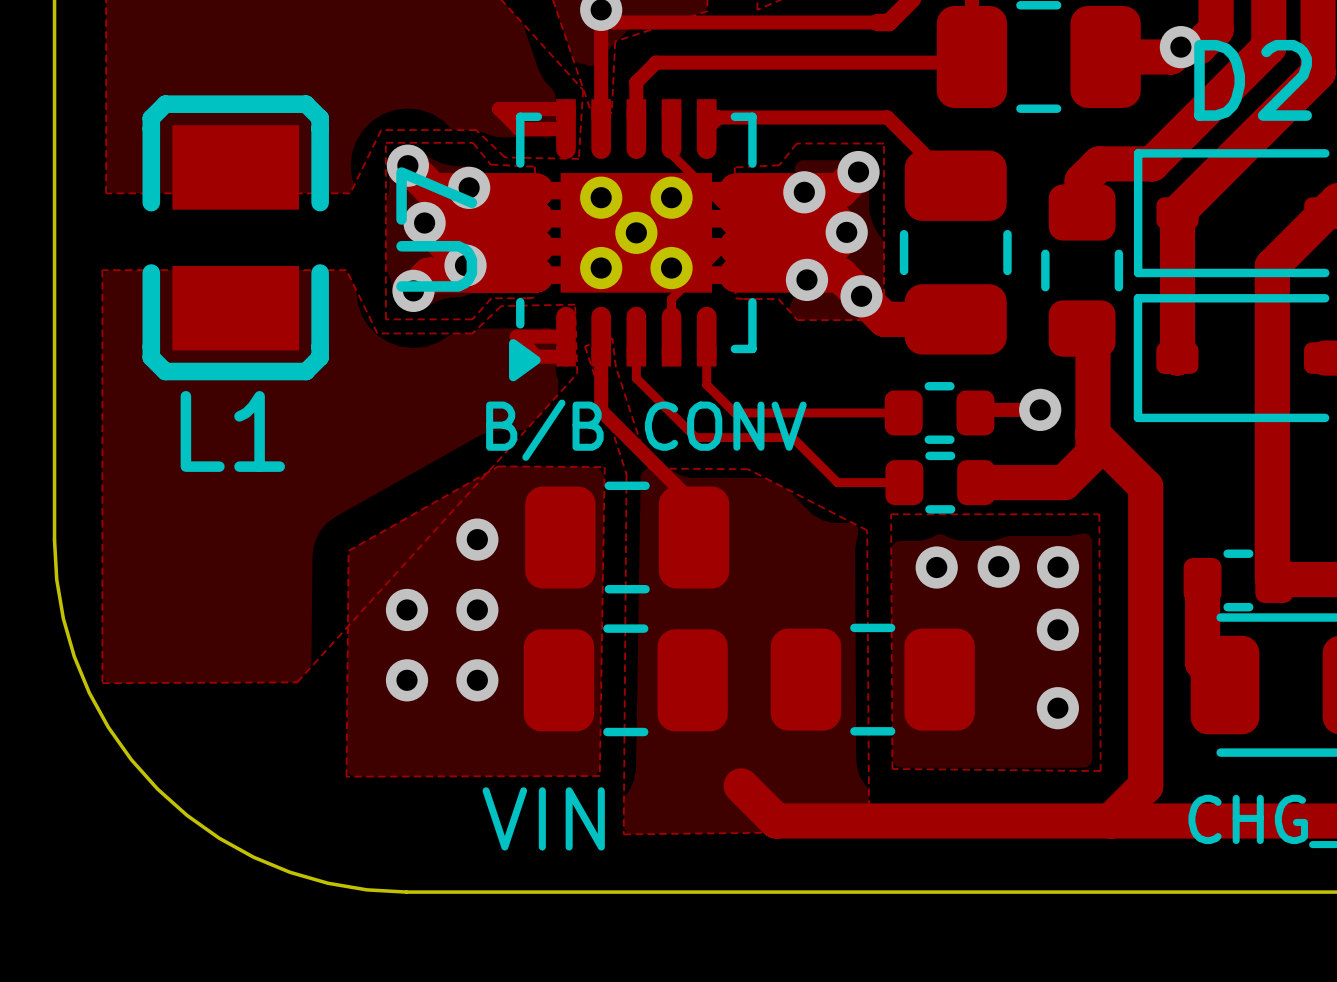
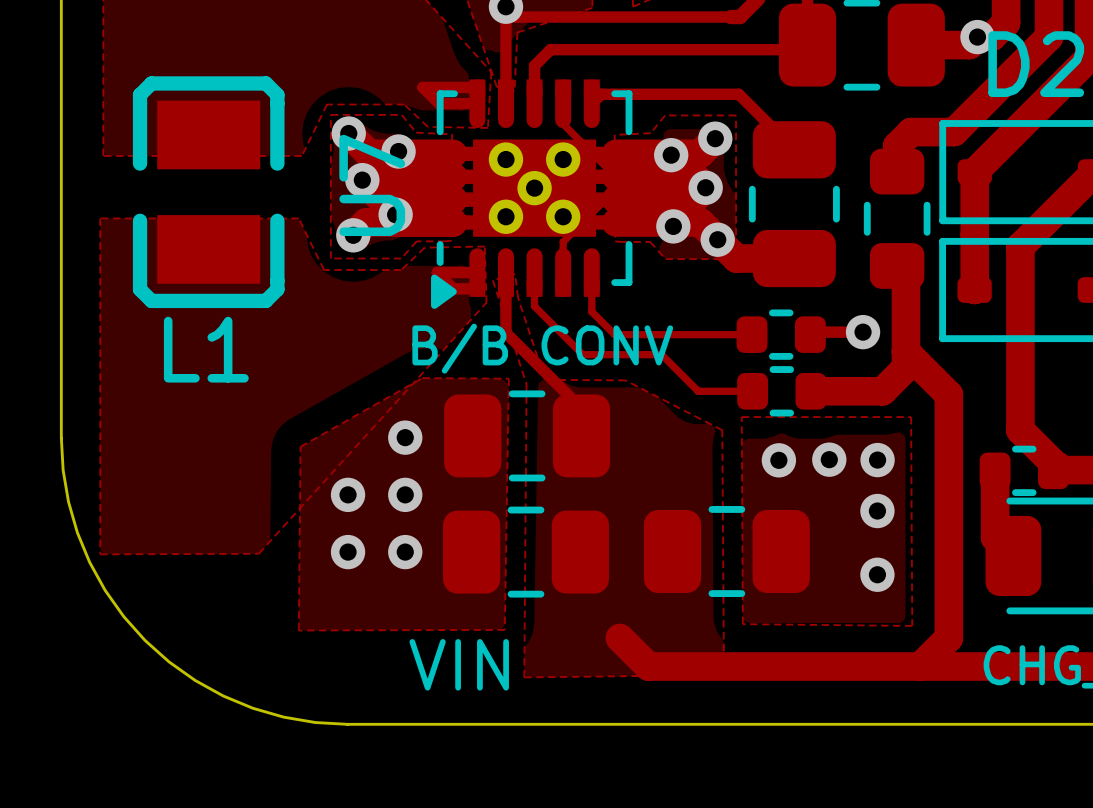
track: (1272, 266) (1272, 578) (1274, 580) -> (1051, 215) (1020, 246) (1020, 430) (1053, 463) (1053, 470)

